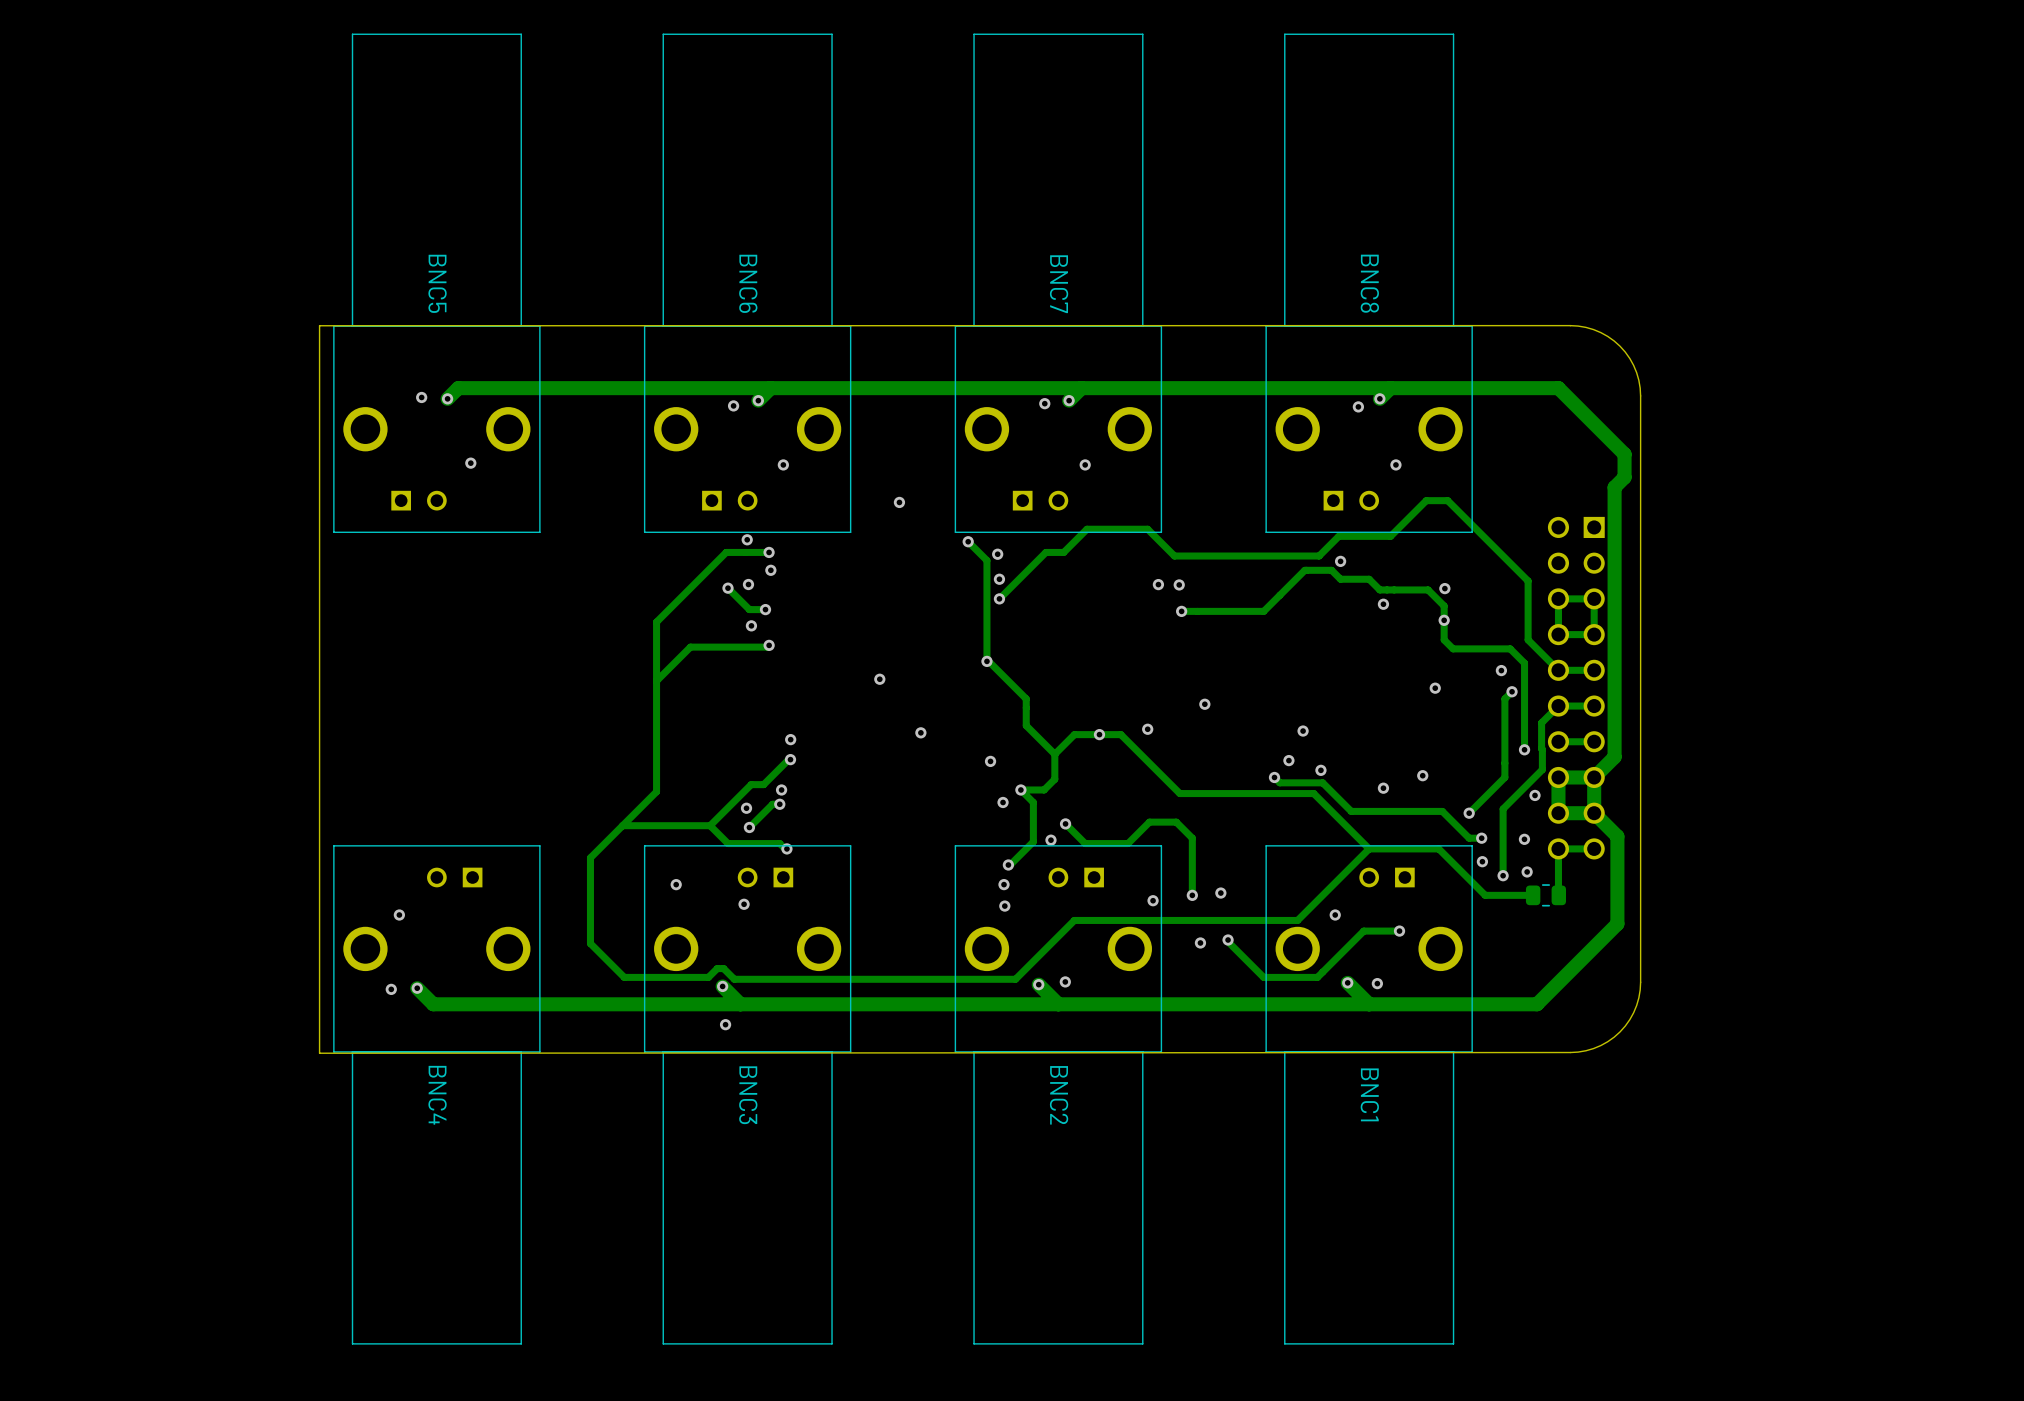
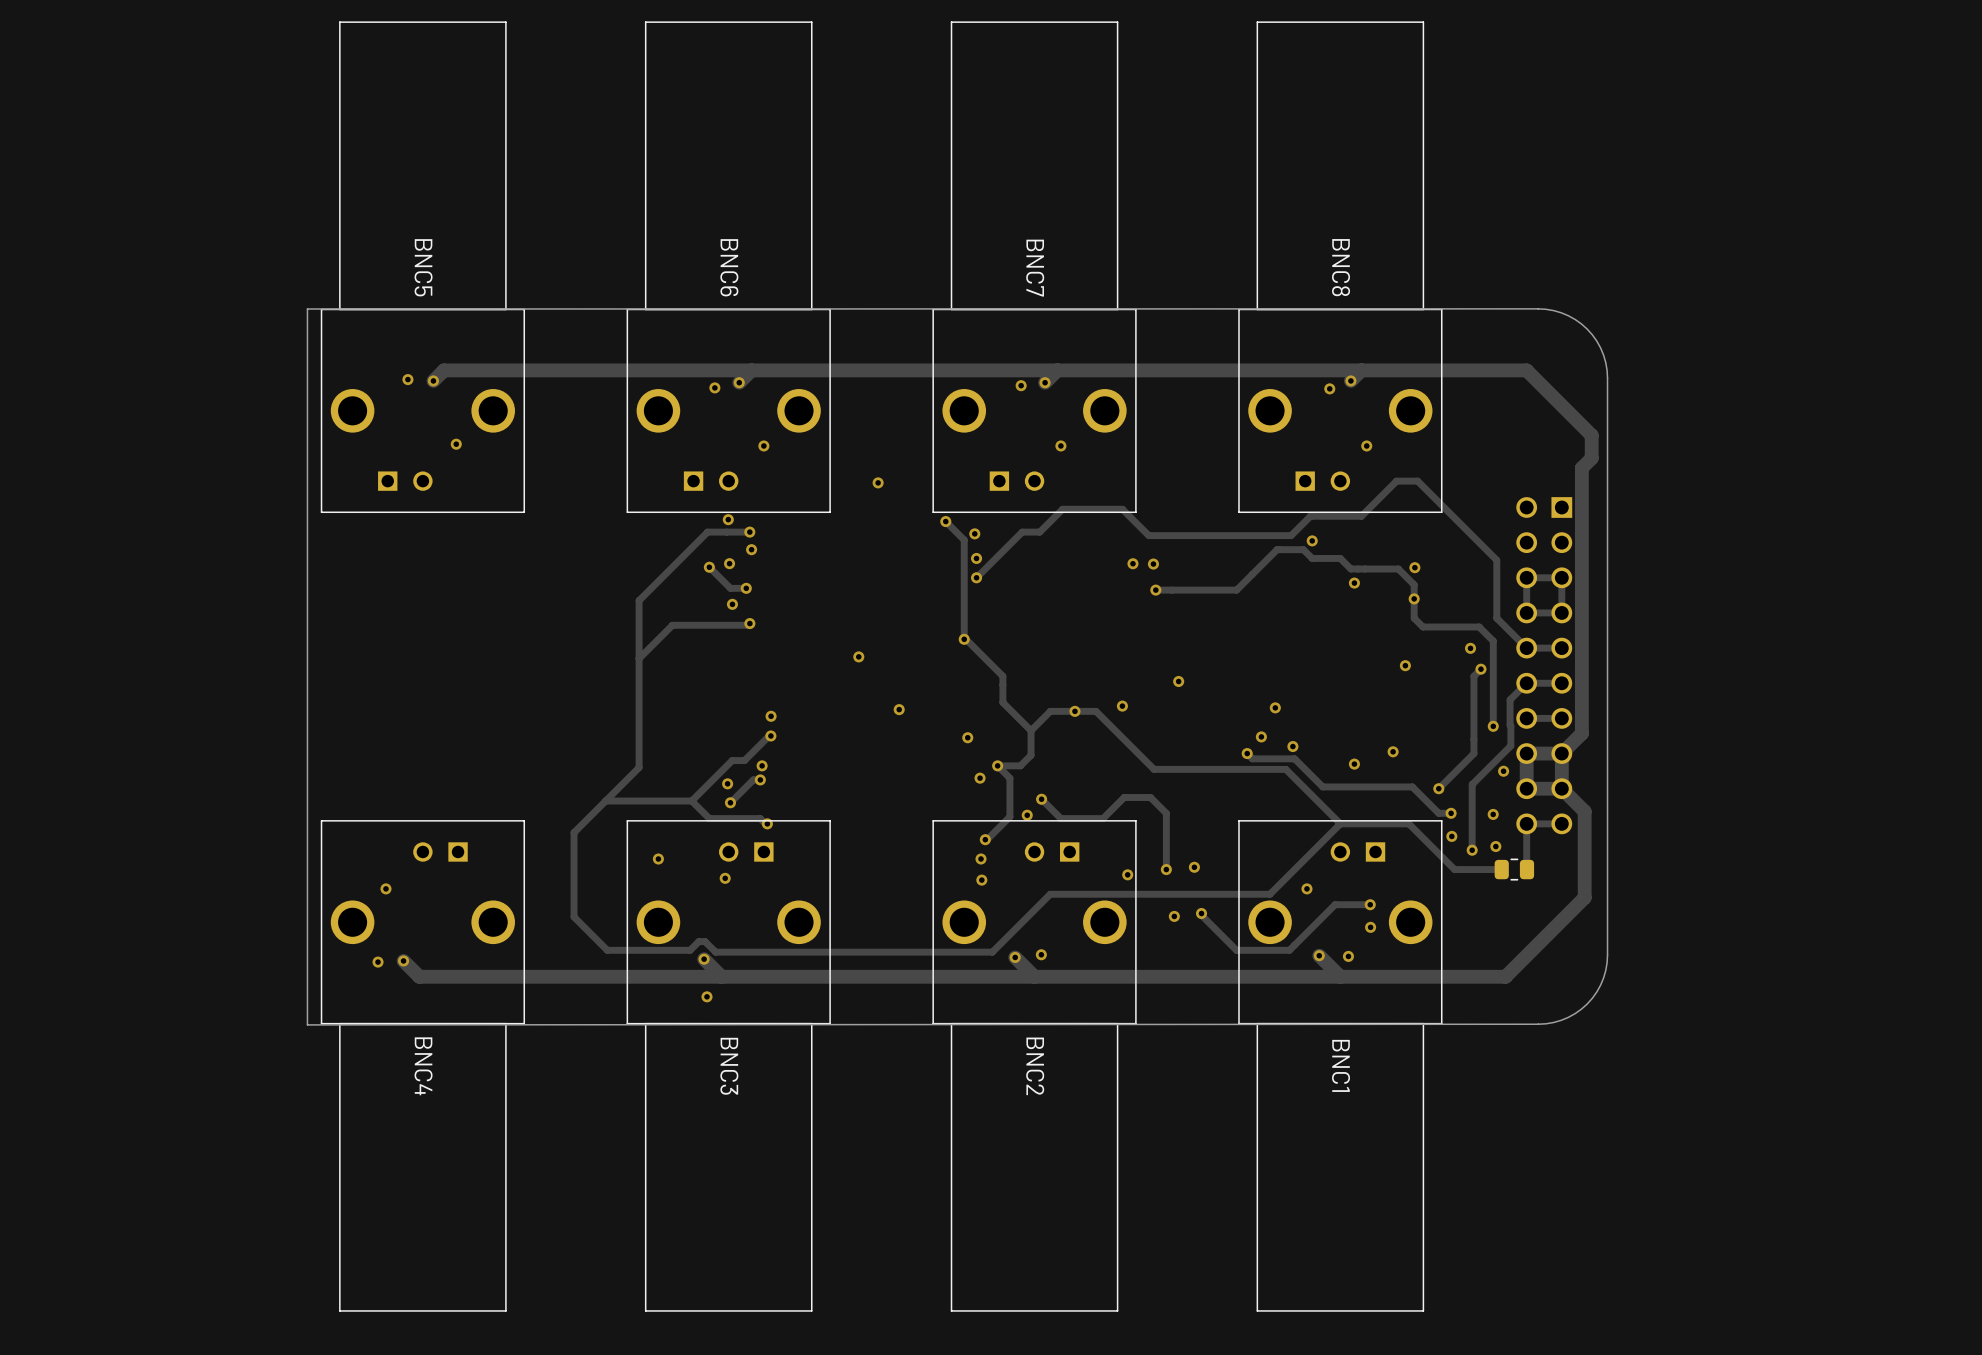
via: none -> (1370, 927)

